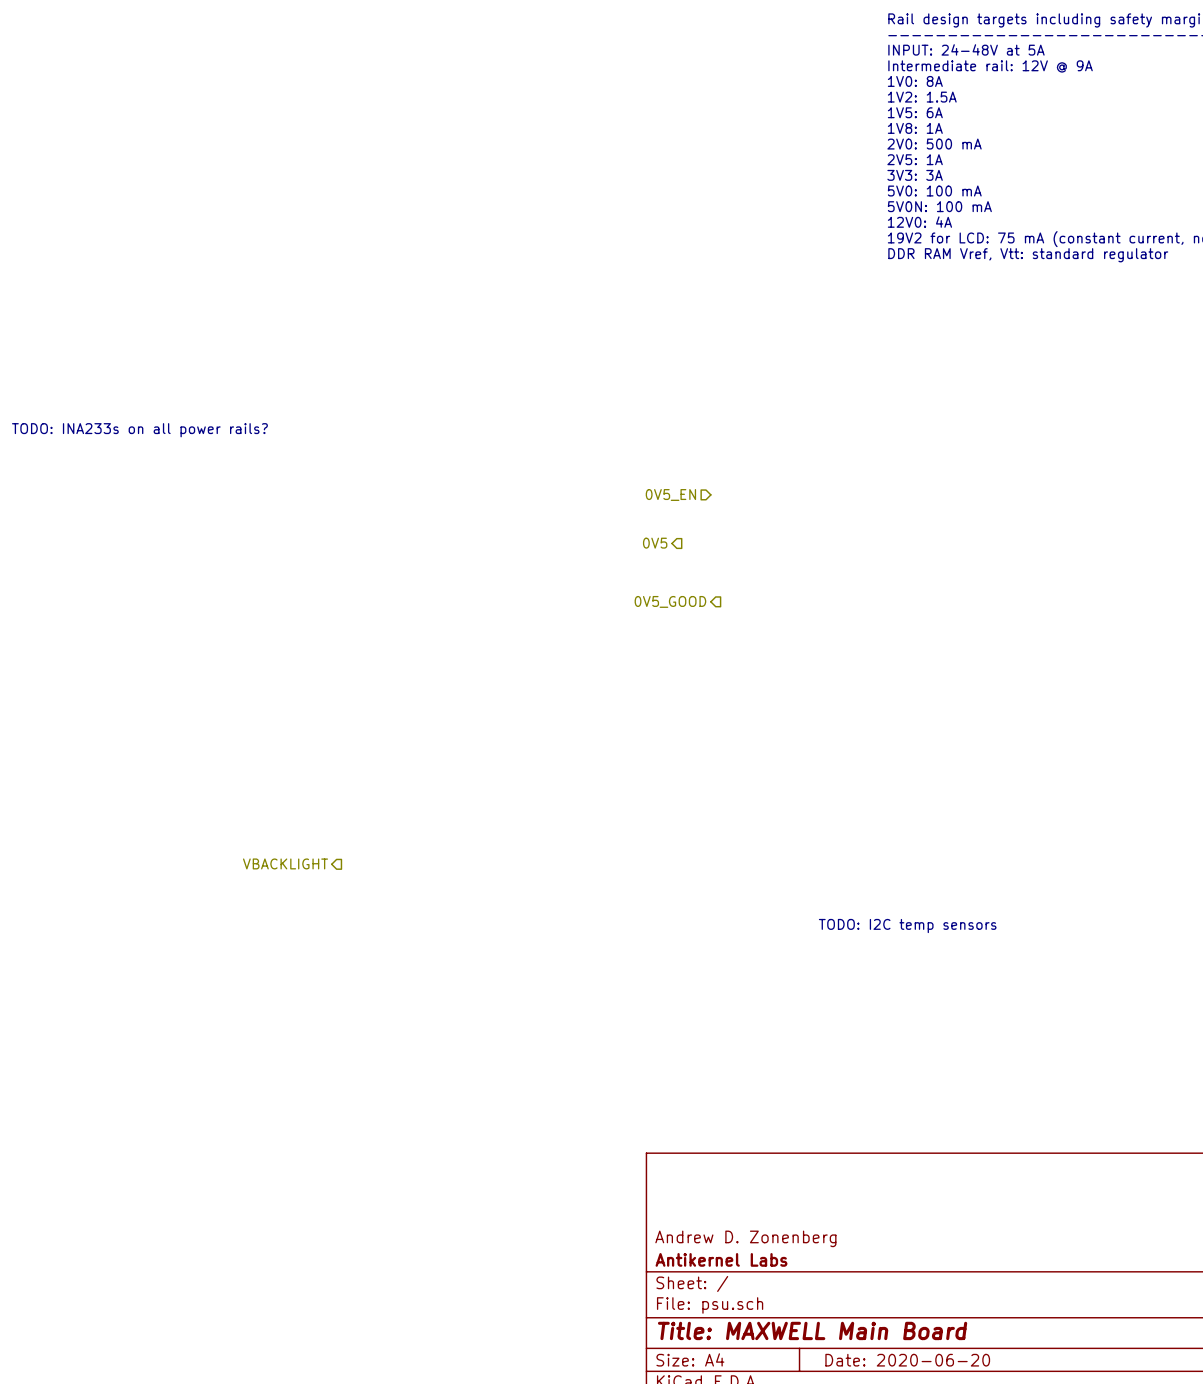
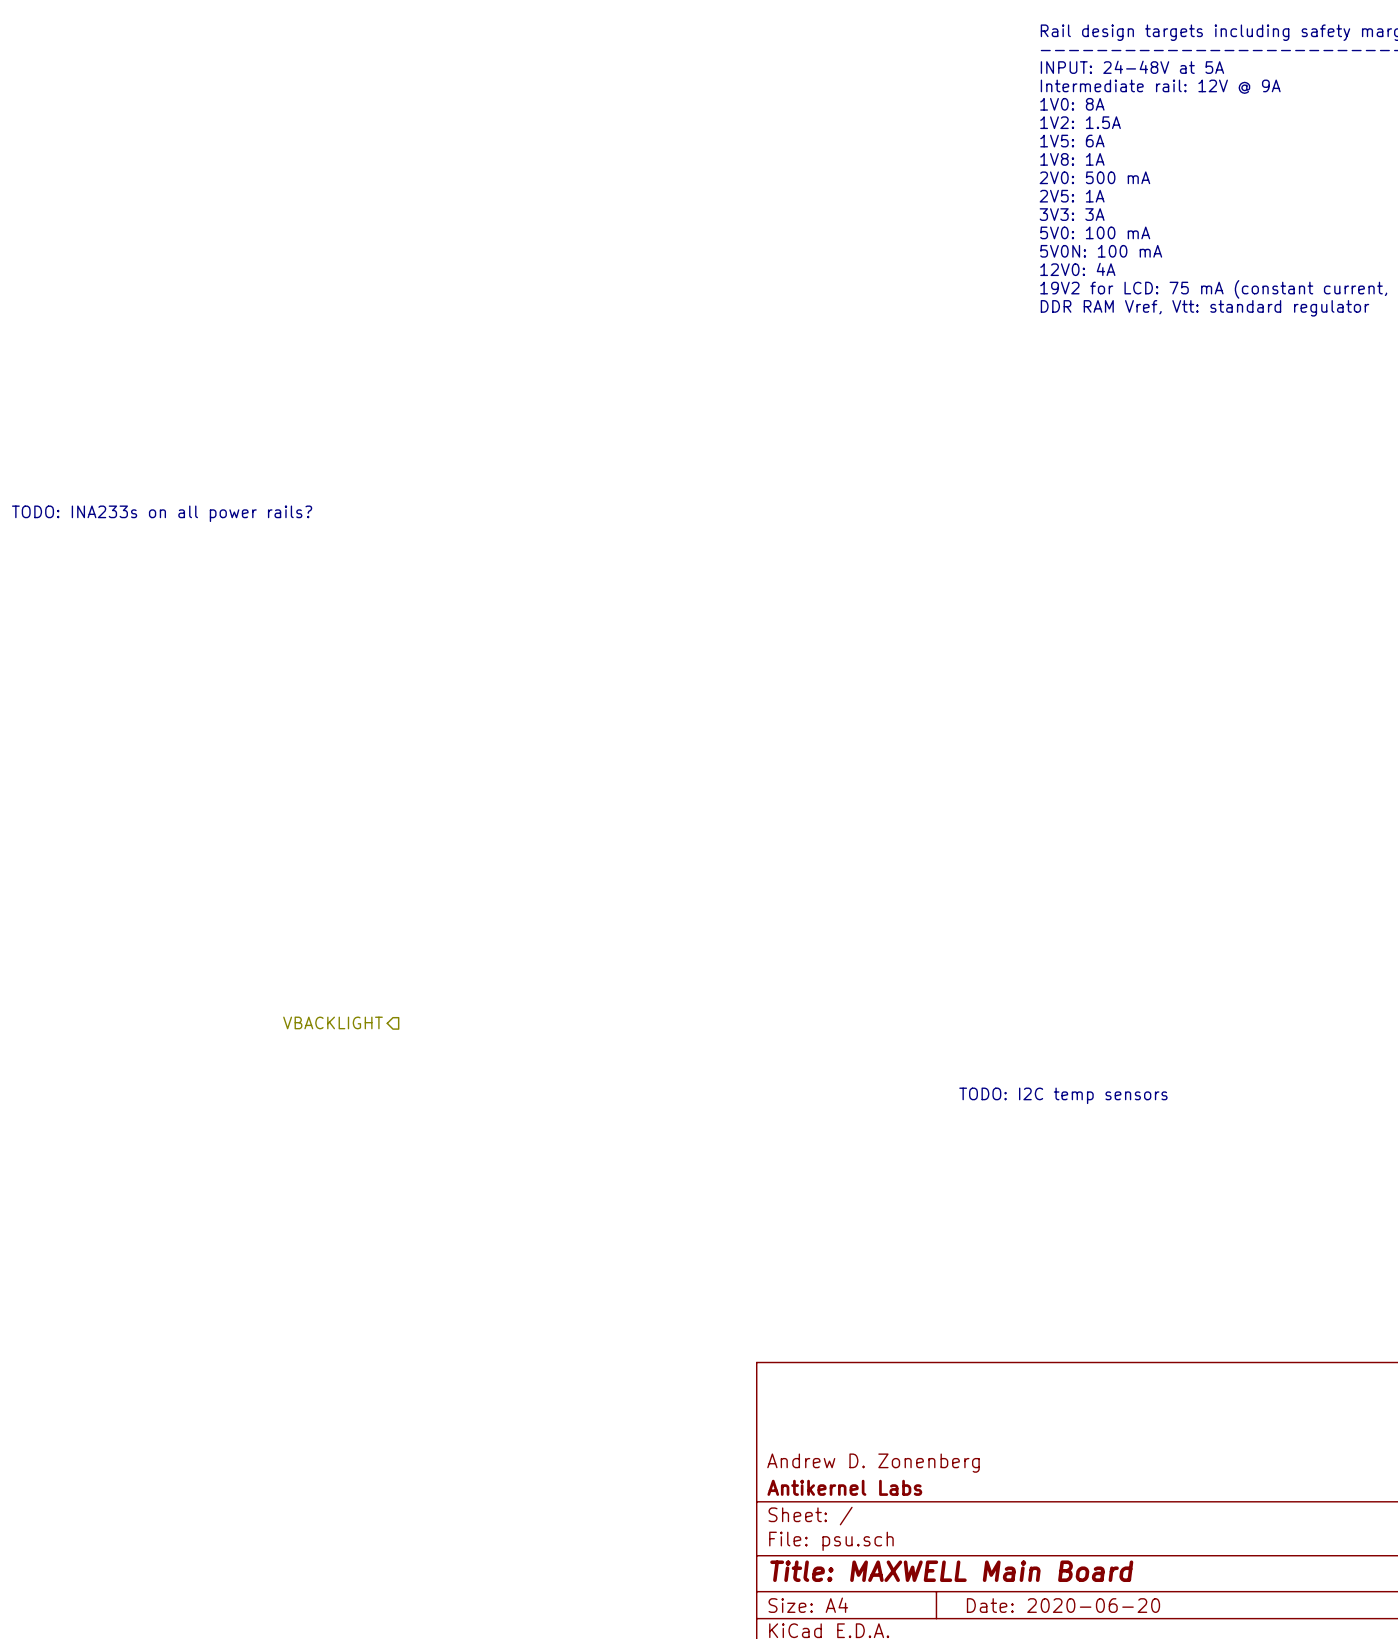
hierarchical label: 0V5_EN (670, 495) -> none
hierarchical label: 0V5 (655, 543) -> none
hierarchical label: 0V5_GOOD (670, 601) -> none

